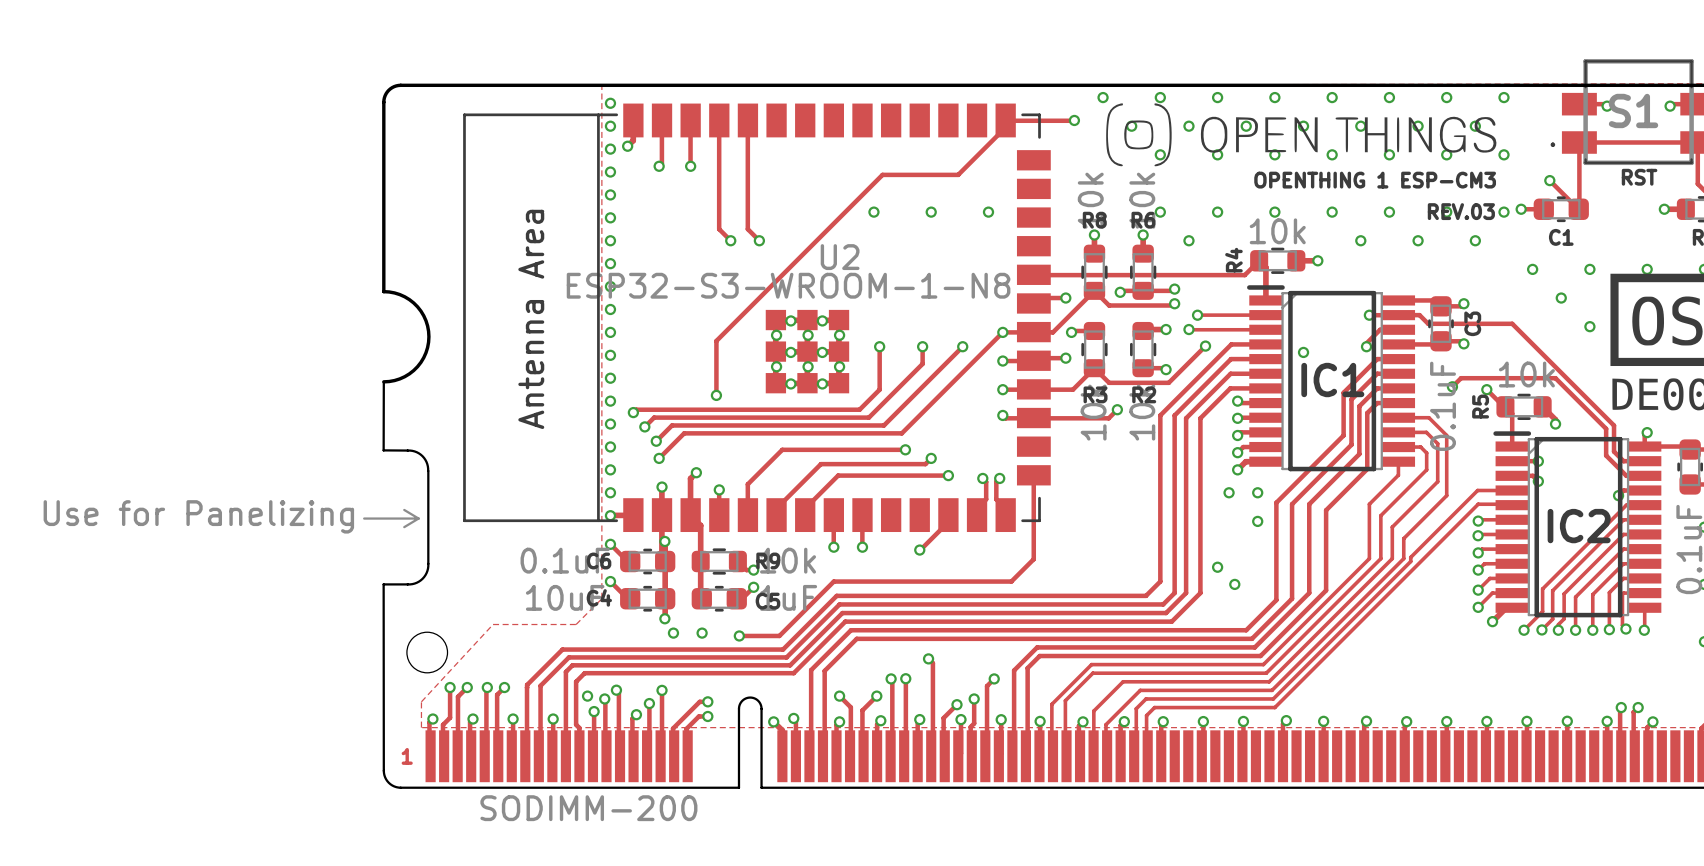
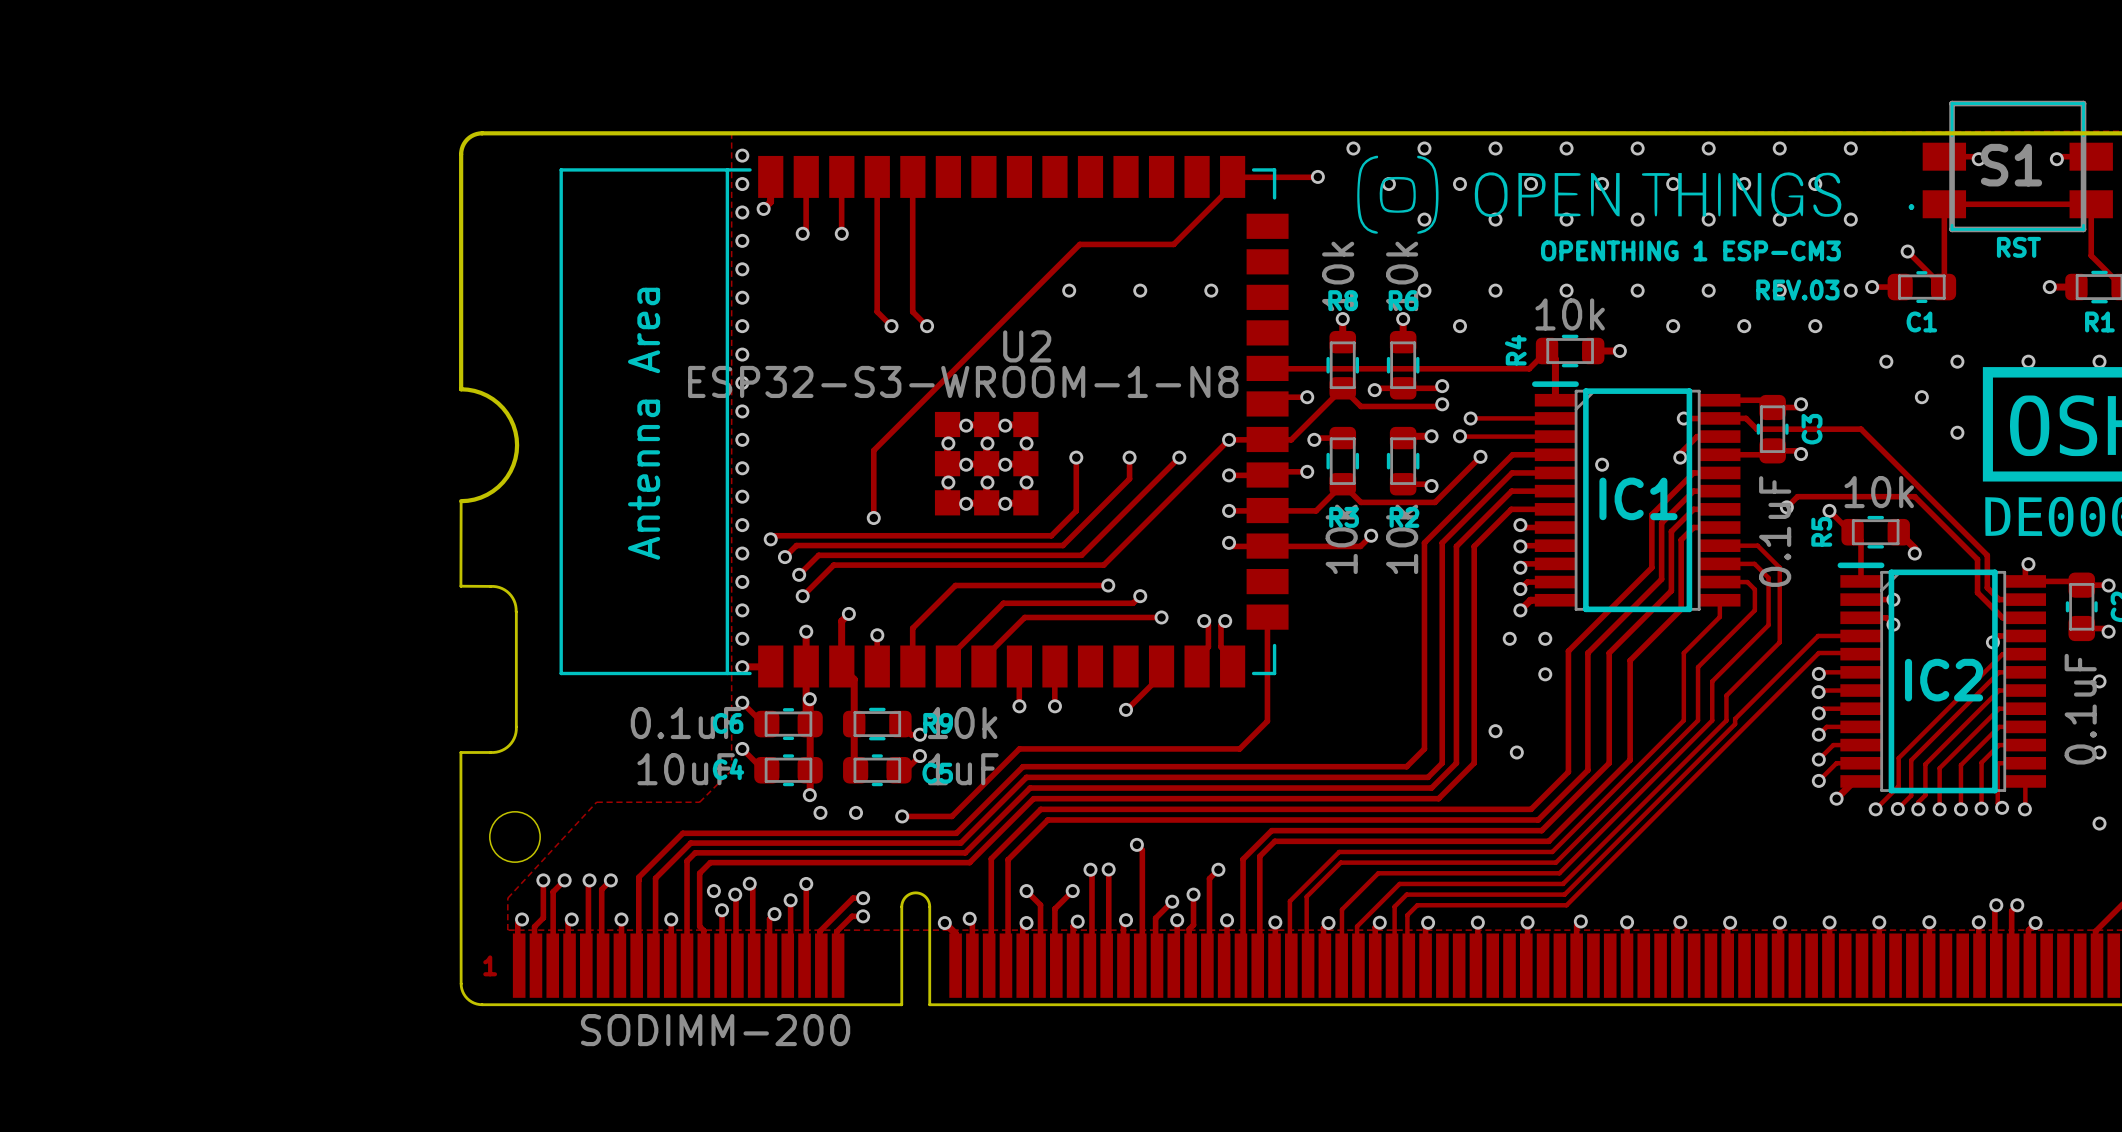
line: (404, 509) (418, 518) -> none
text: Use for Panelizing (198, 516) -> none
line: (364, 518) (418, 518) -> none
line: (418, 518) (404, 527) -> none

